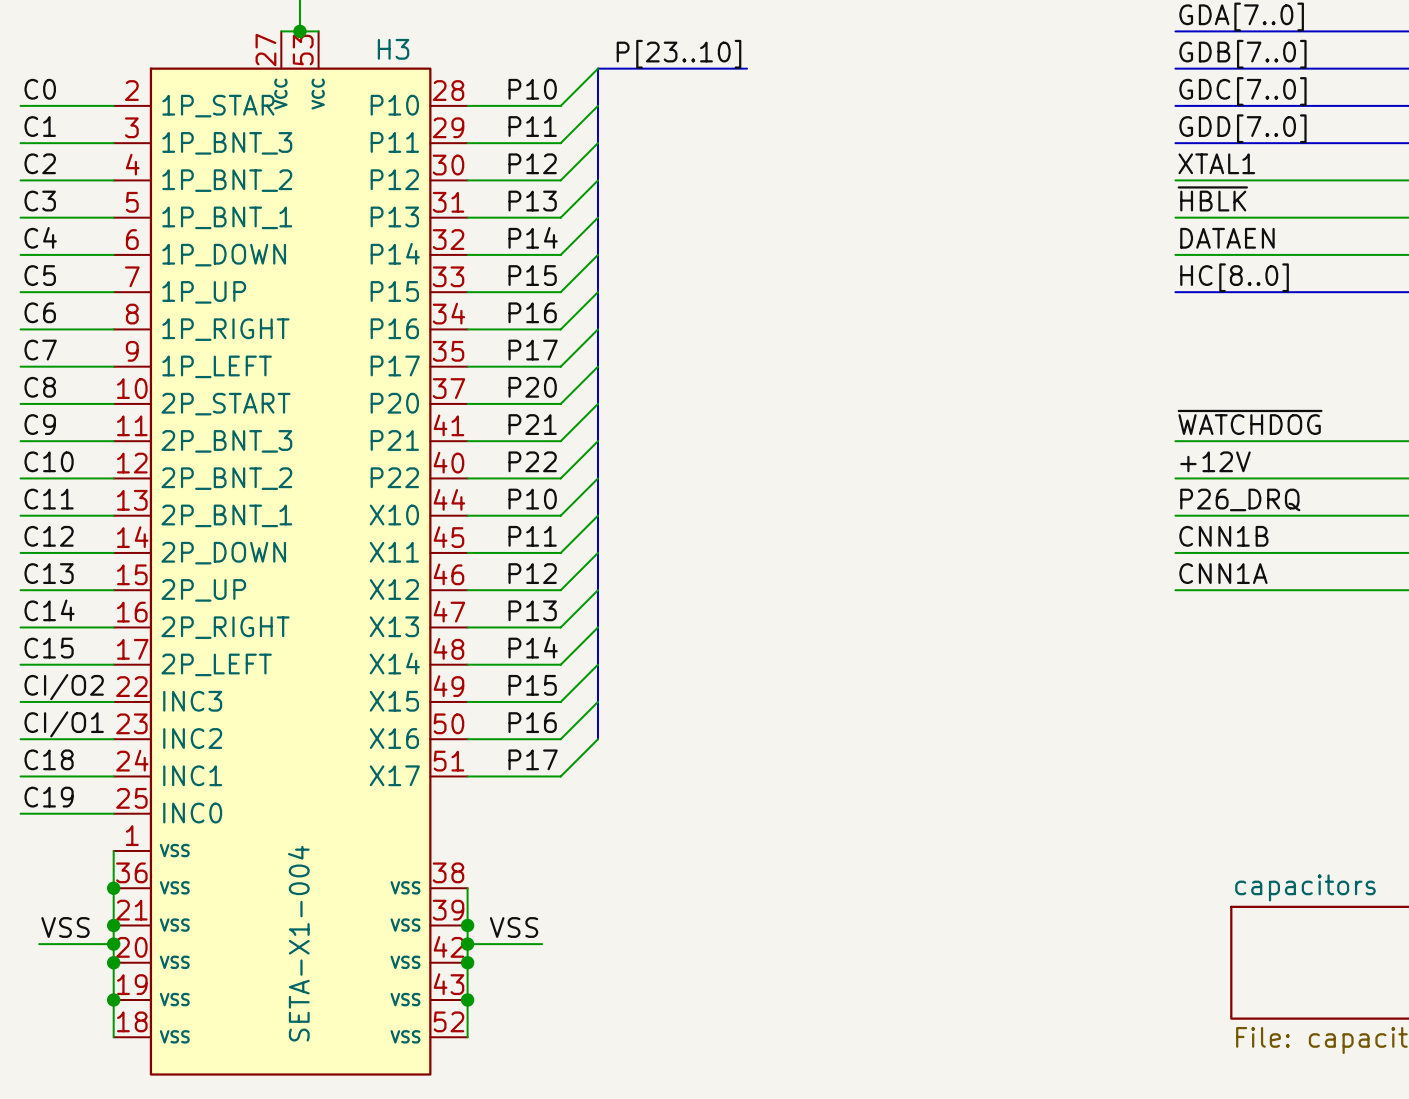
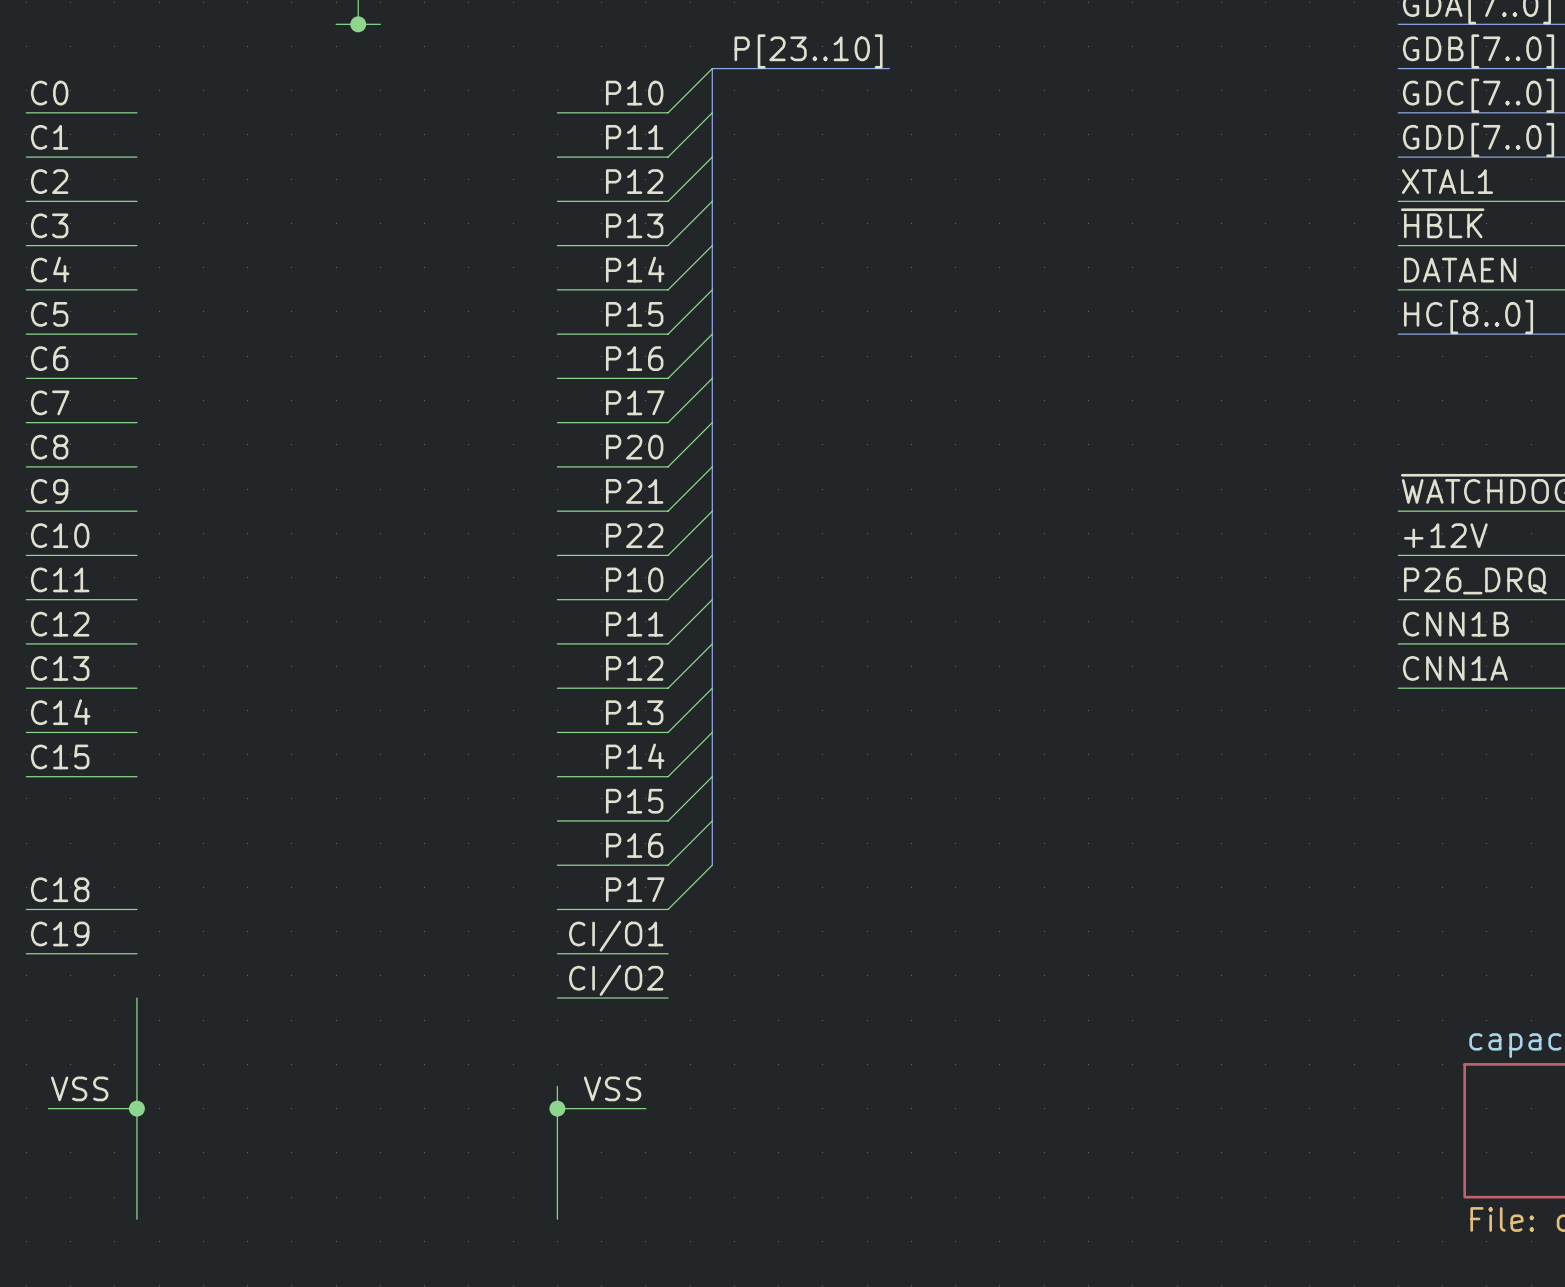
H3: SETA-X1-004 (290, 553) -> none
label: CI/O2 (64, 687) -> none
wire: (20, 701) (113, 701) -> none
label: CI/O1 (64, 724) -> none
wire: (20, 739) (113, 739) -> none
label: none -> CI/O1 (616, 936)
wire: none -> (557, 953) (668, 953)
label: none -> CI/O2 (616, 980)
wire: none -> (557, 998) (668, 998)
junction: (113, 888) -> none
wire: (467, 888) (467, 925) -> none
junction: (113, 925) -> none
junction: (467, 925) -> none
junction: (113, 962) -> none
junction: (467, 962) -> none
junction: (113, 999) -> none
junction: (467, 999) -> none

